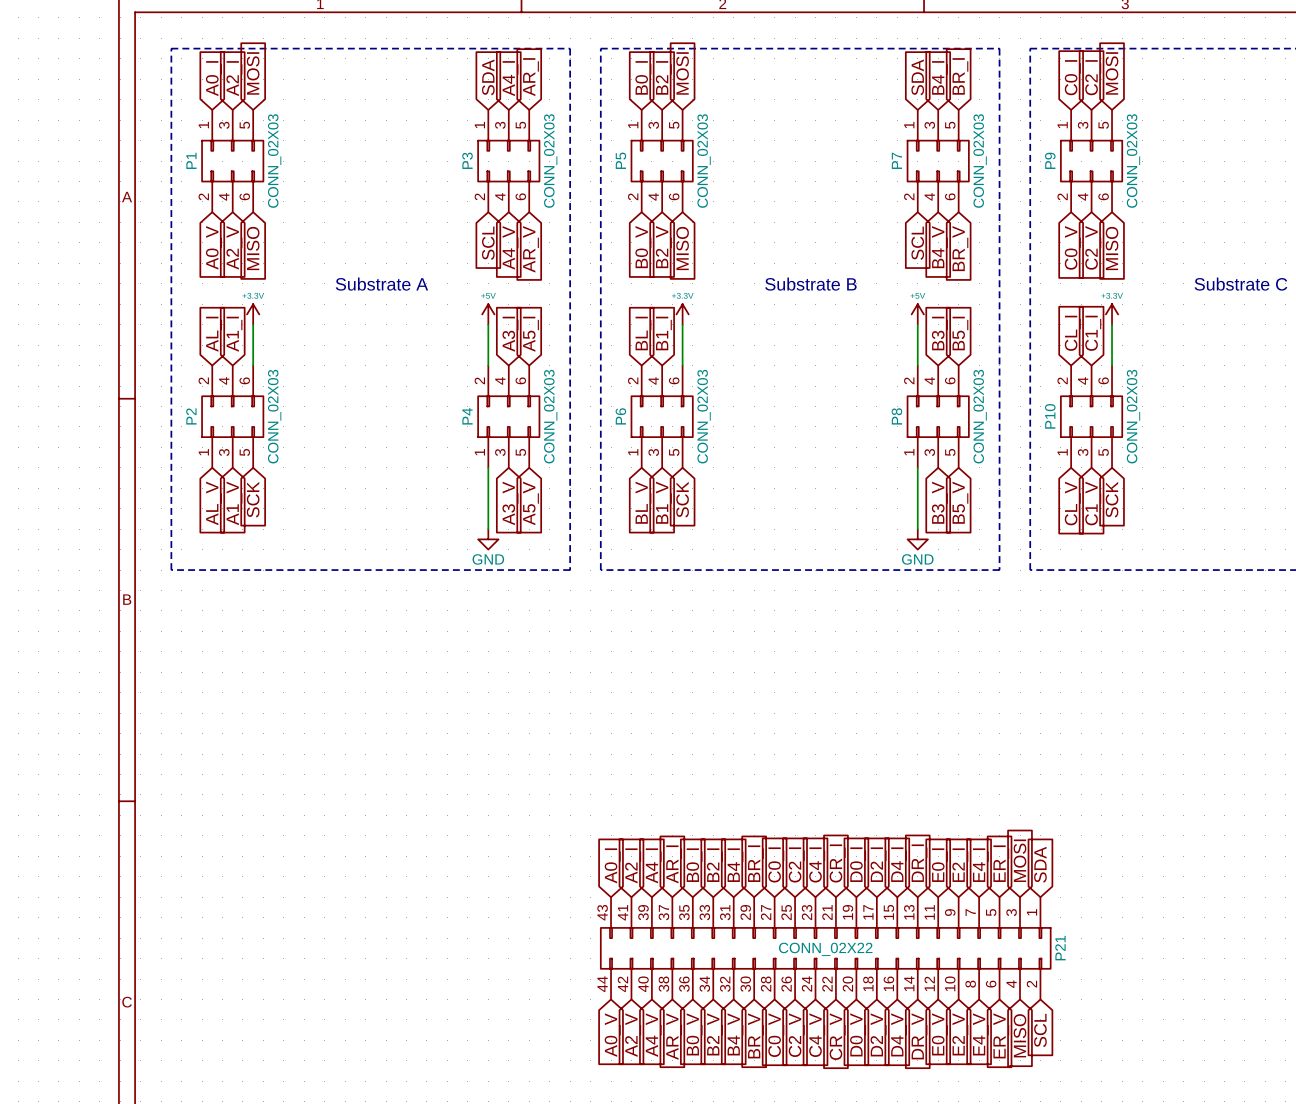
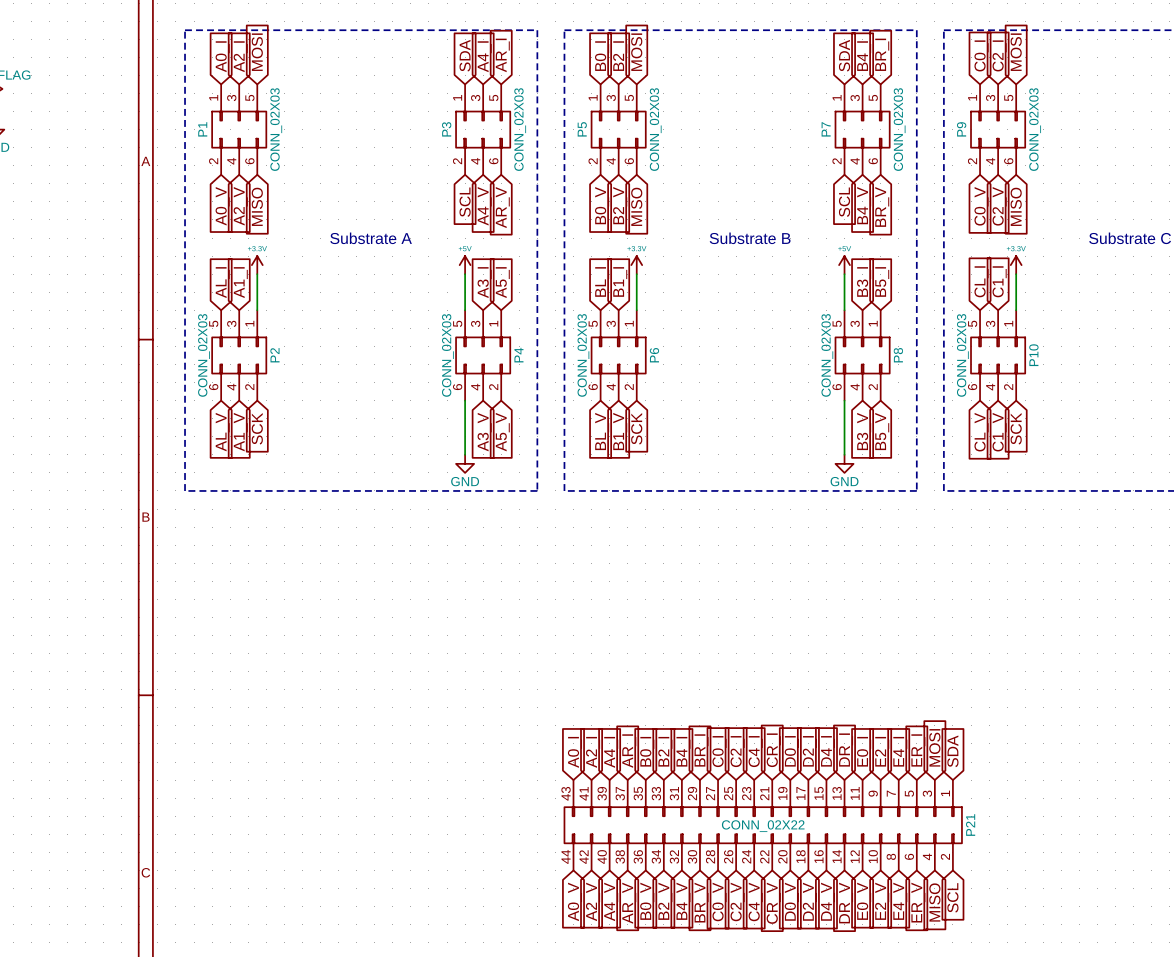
P2 rotation: 0° (232, 416) -> 180° (239, 355)
P4 rotation: 0° (508, 416) -> 180° (483, 355)
P6 rotation: 0° (662, 416) -> 180° (618, 355)
P8 rotation: 0° (938, 416) -> 180° (862, 355)
P10 rotation: 0° (1091, 416) -> 180° (998, 355)

